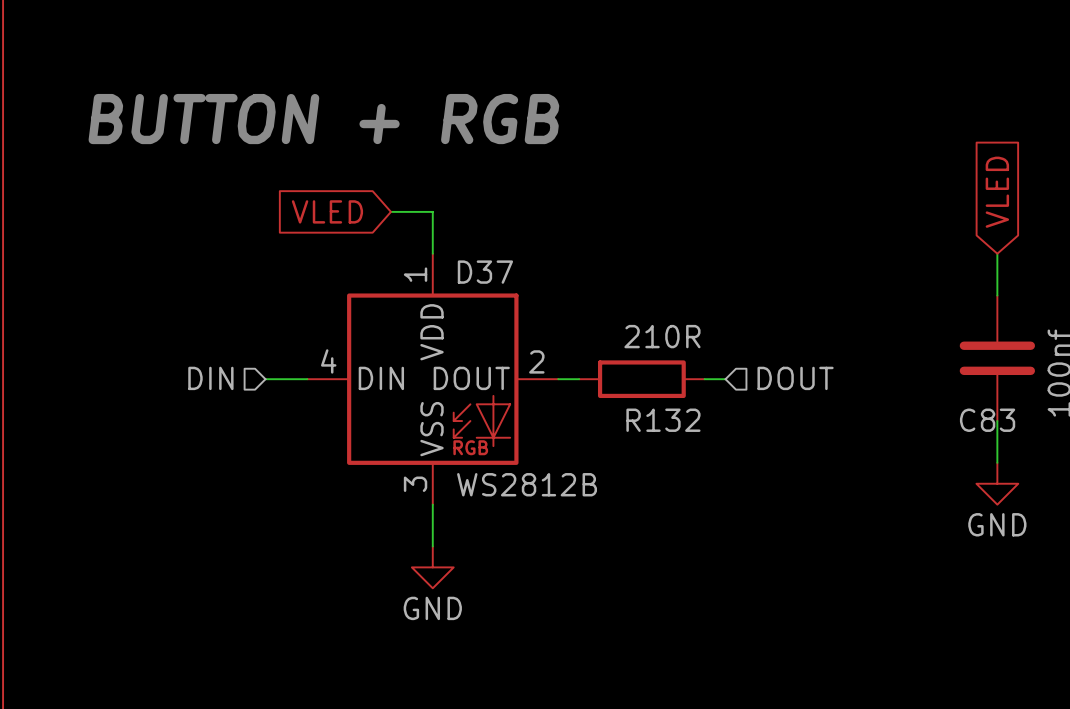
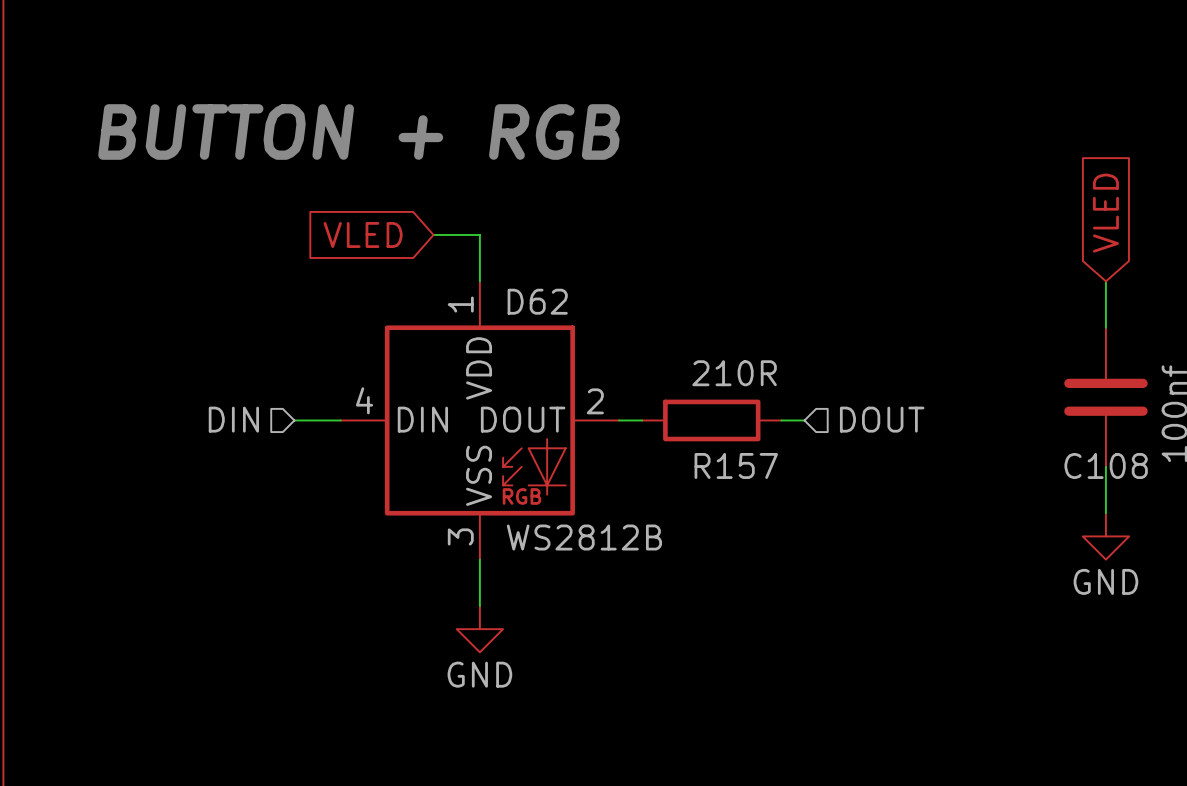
D37 name: D37 (485, 272) -> D62 (537, 301)
R132 name: R132 (663, 420) -> R157 (736, 465)
C83 name: C83 (987, 420) -> C108 (1106, 465)

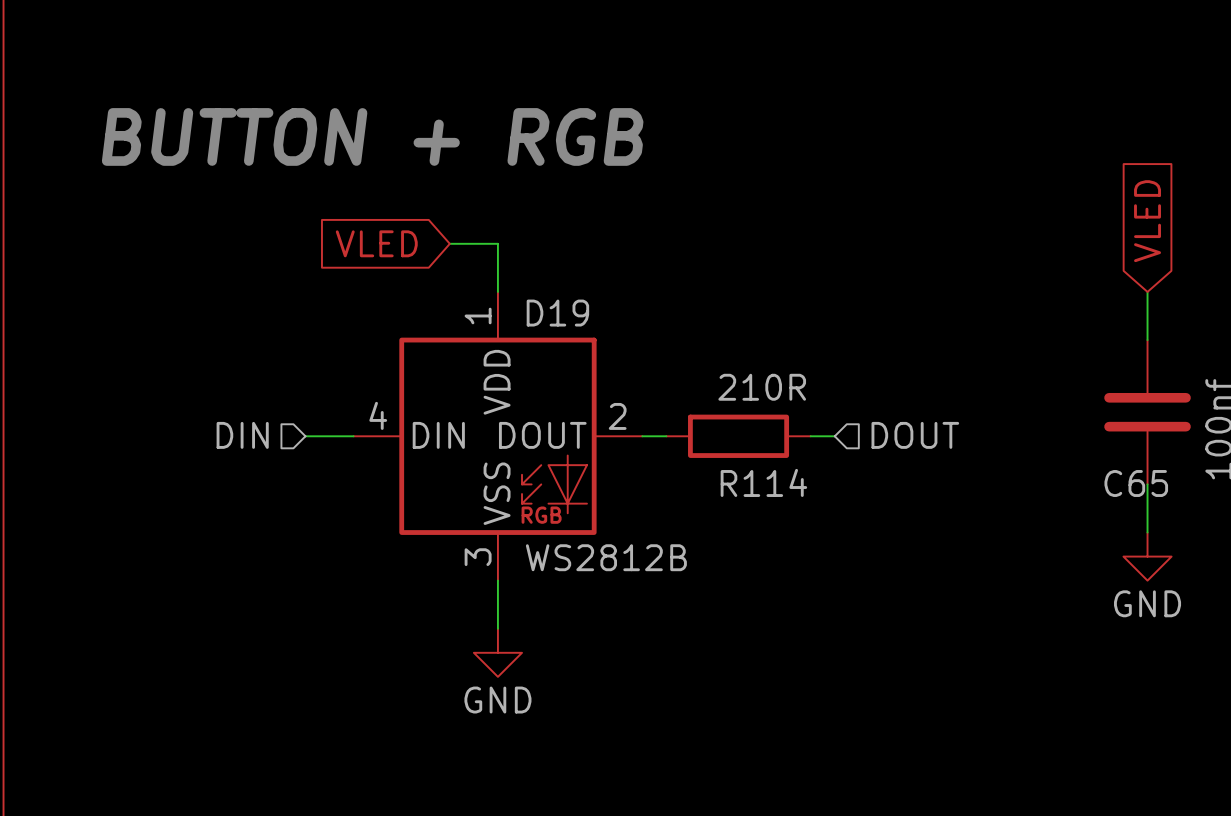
D62 name: D62 (537, 301) -> D19 (557, 313)
R157 name: R157 (736, 465) -> R114 (763, 482)
C108 name: C108 (1106, 465) -> C65 (1136, 483)

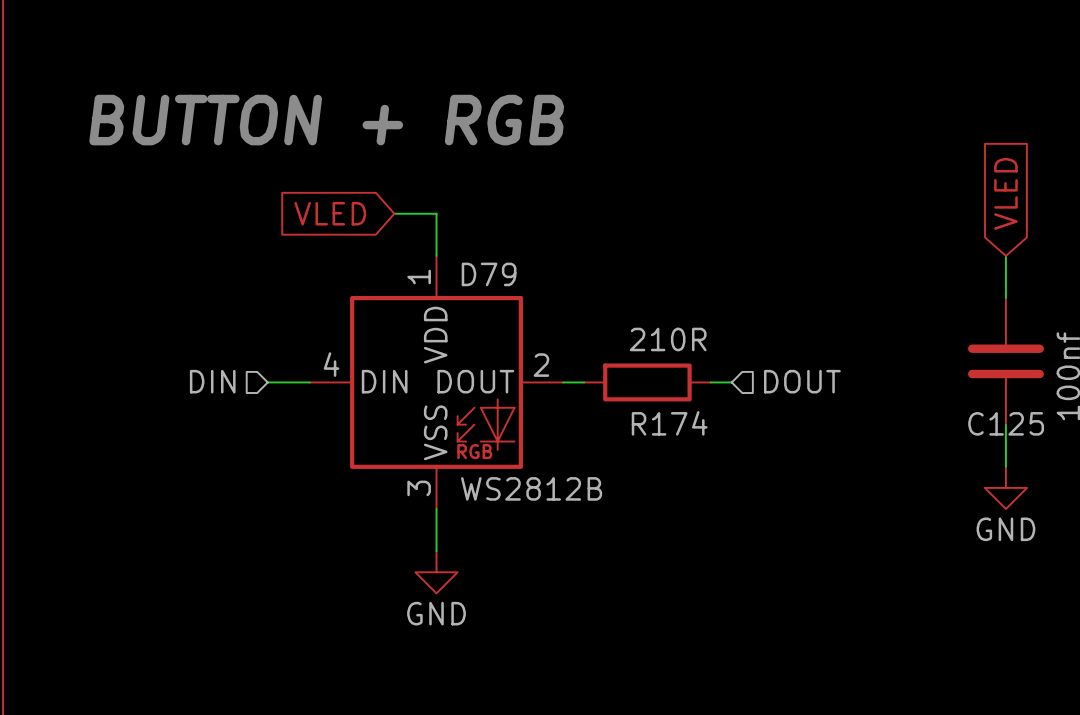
D19 name: D19 (557, 313) -> D79 (489, 274)
R114 name: R114 (763, 482) -> R174 (669, 423)
C65 name: C65 (1136, 483) -> C125 (1006, 423)

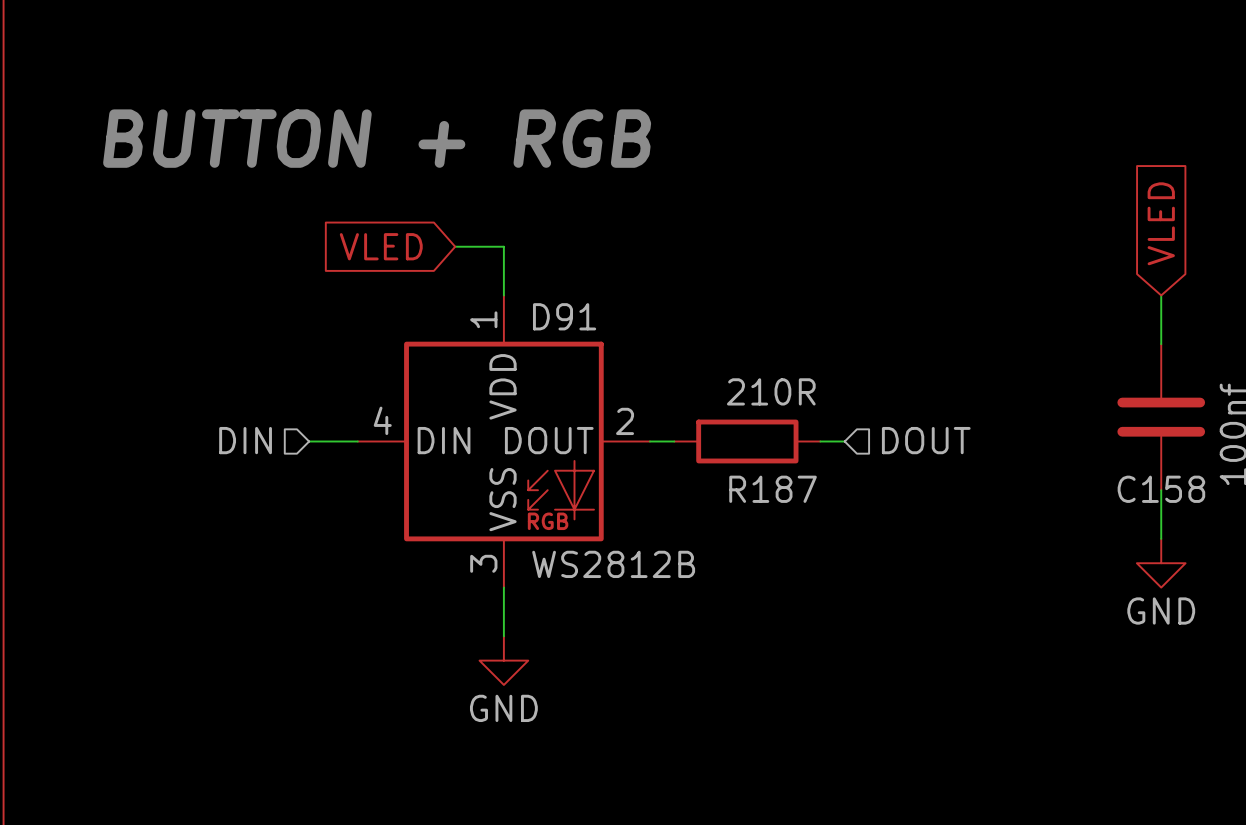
D79 name: D79 (489, 274) -> D91 (564, 316)
R174 name: R174 (669, 423) -> R187 (773, 489)
C125 name: C125 (1006, 423) -> C158 (1161, 489)

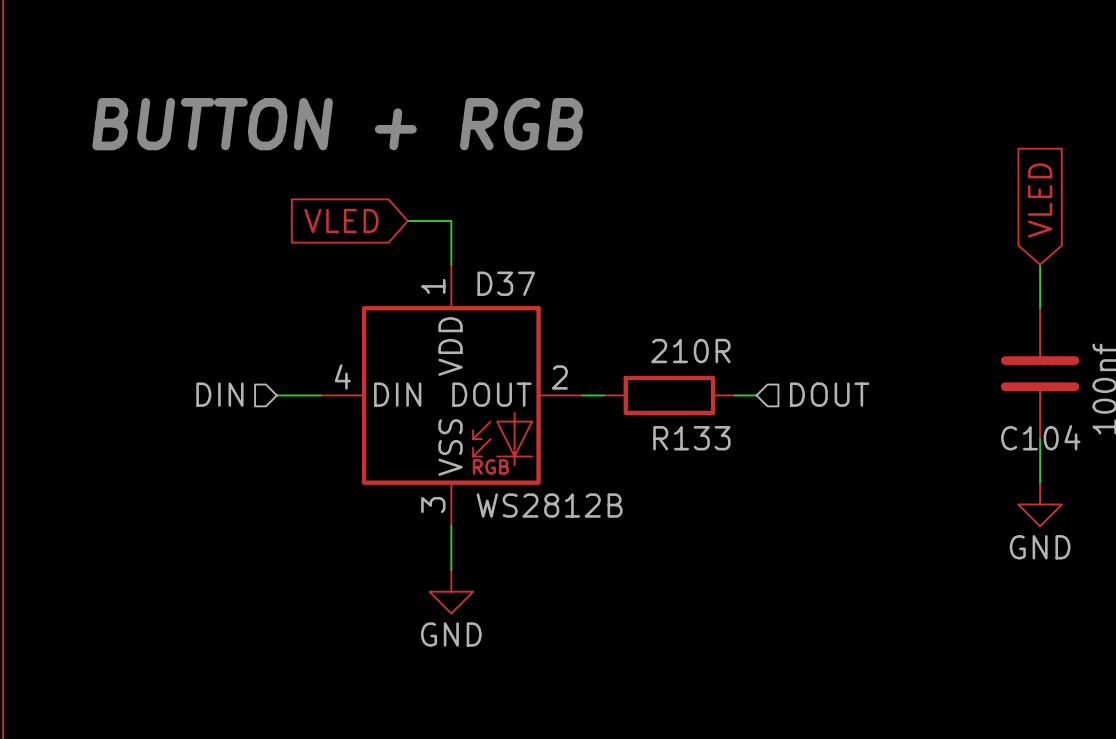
D91 name: D91 (564, 316) -> D37 (506, 283)
R187 name: R187 (773, 489) -> R133 (691, 438)
C158 name: C158 (1161, 489) -> C104 (1040, 437)

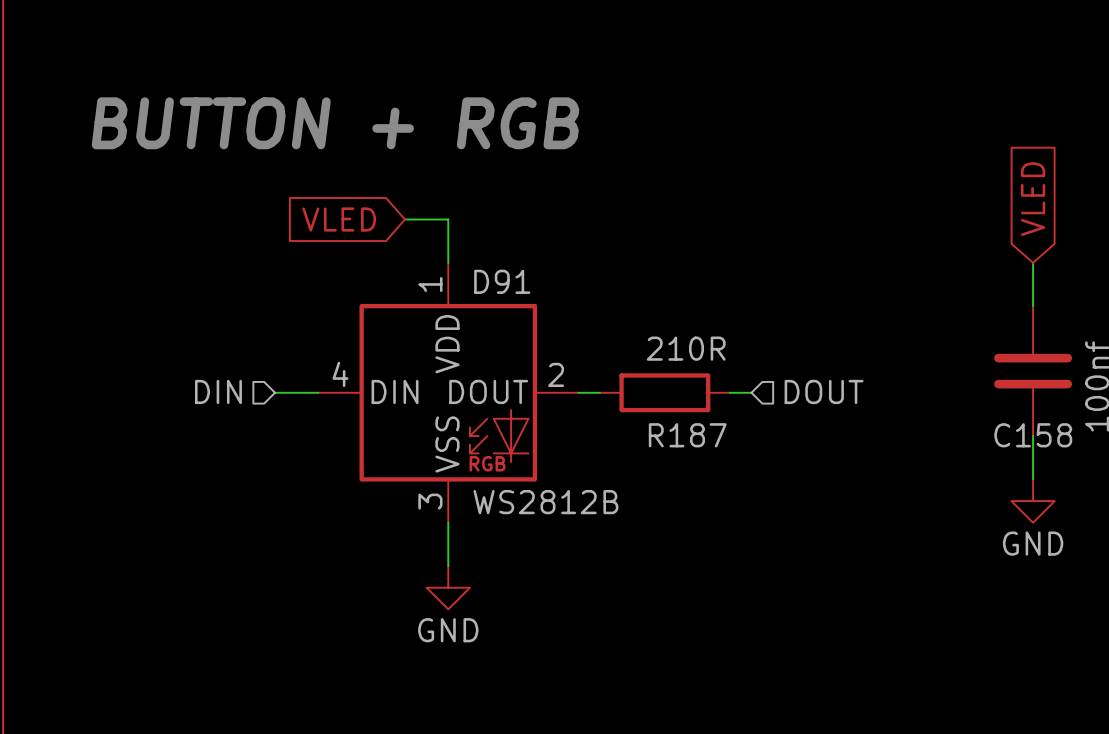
D37 name: D37 (506, 283) -> D91 (502, 281)
C104 name: C104 (1040, 437) -> C158 (1033, 435)
R133 name: R133 (691, 438) -> R187 (687, 435)

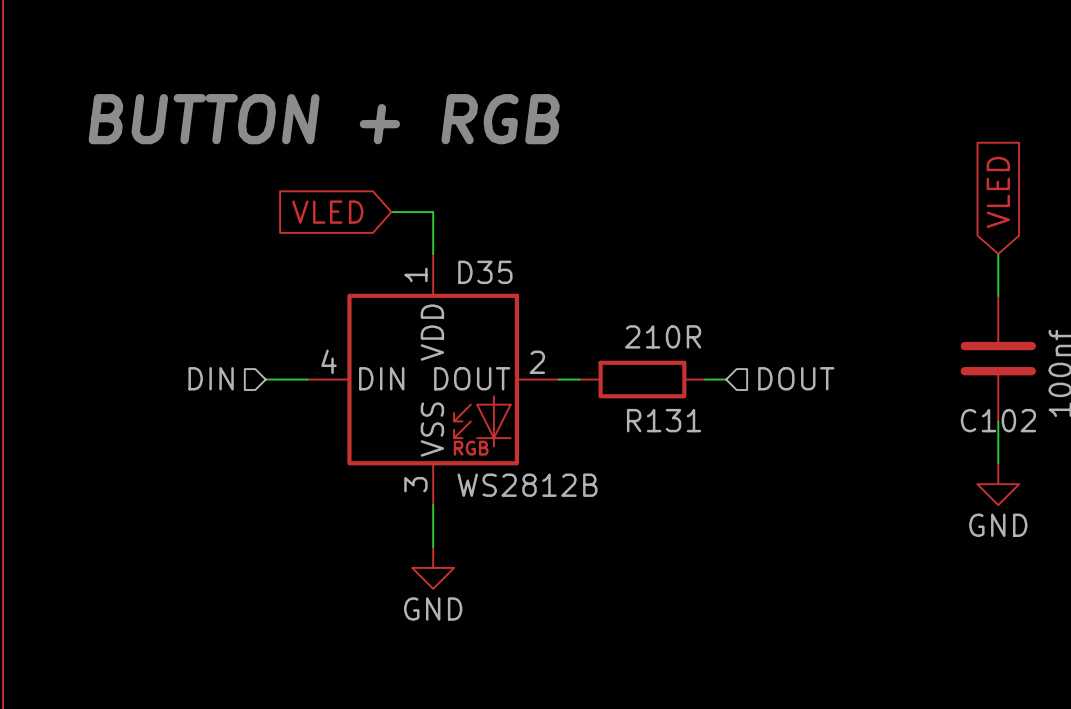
D91 name: D91 (502, 281) -> D35 (485, 272)
R187 name: R187 (687, 435) -> R131 (664, 420)
C158 name: C158 (1033, 435) -> C102 (998, 420)

